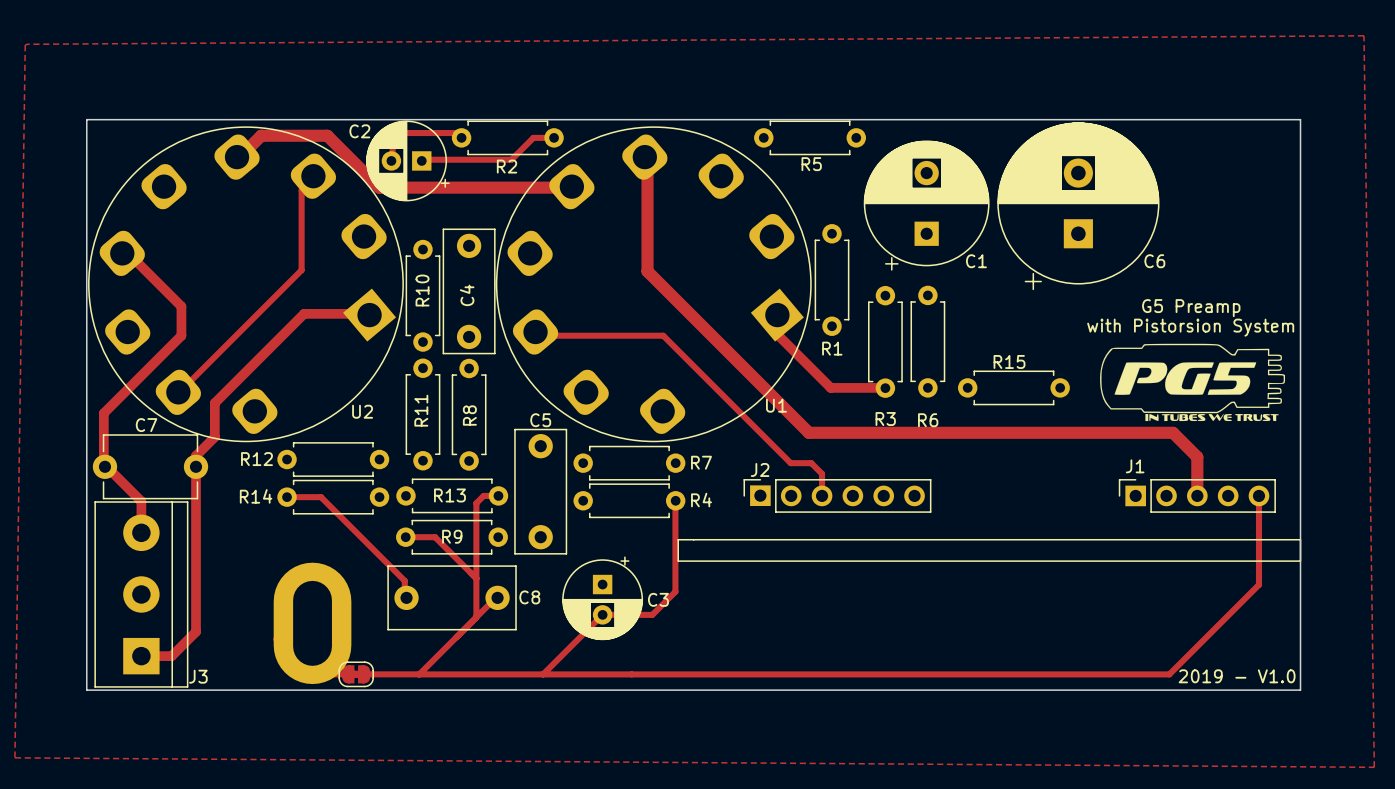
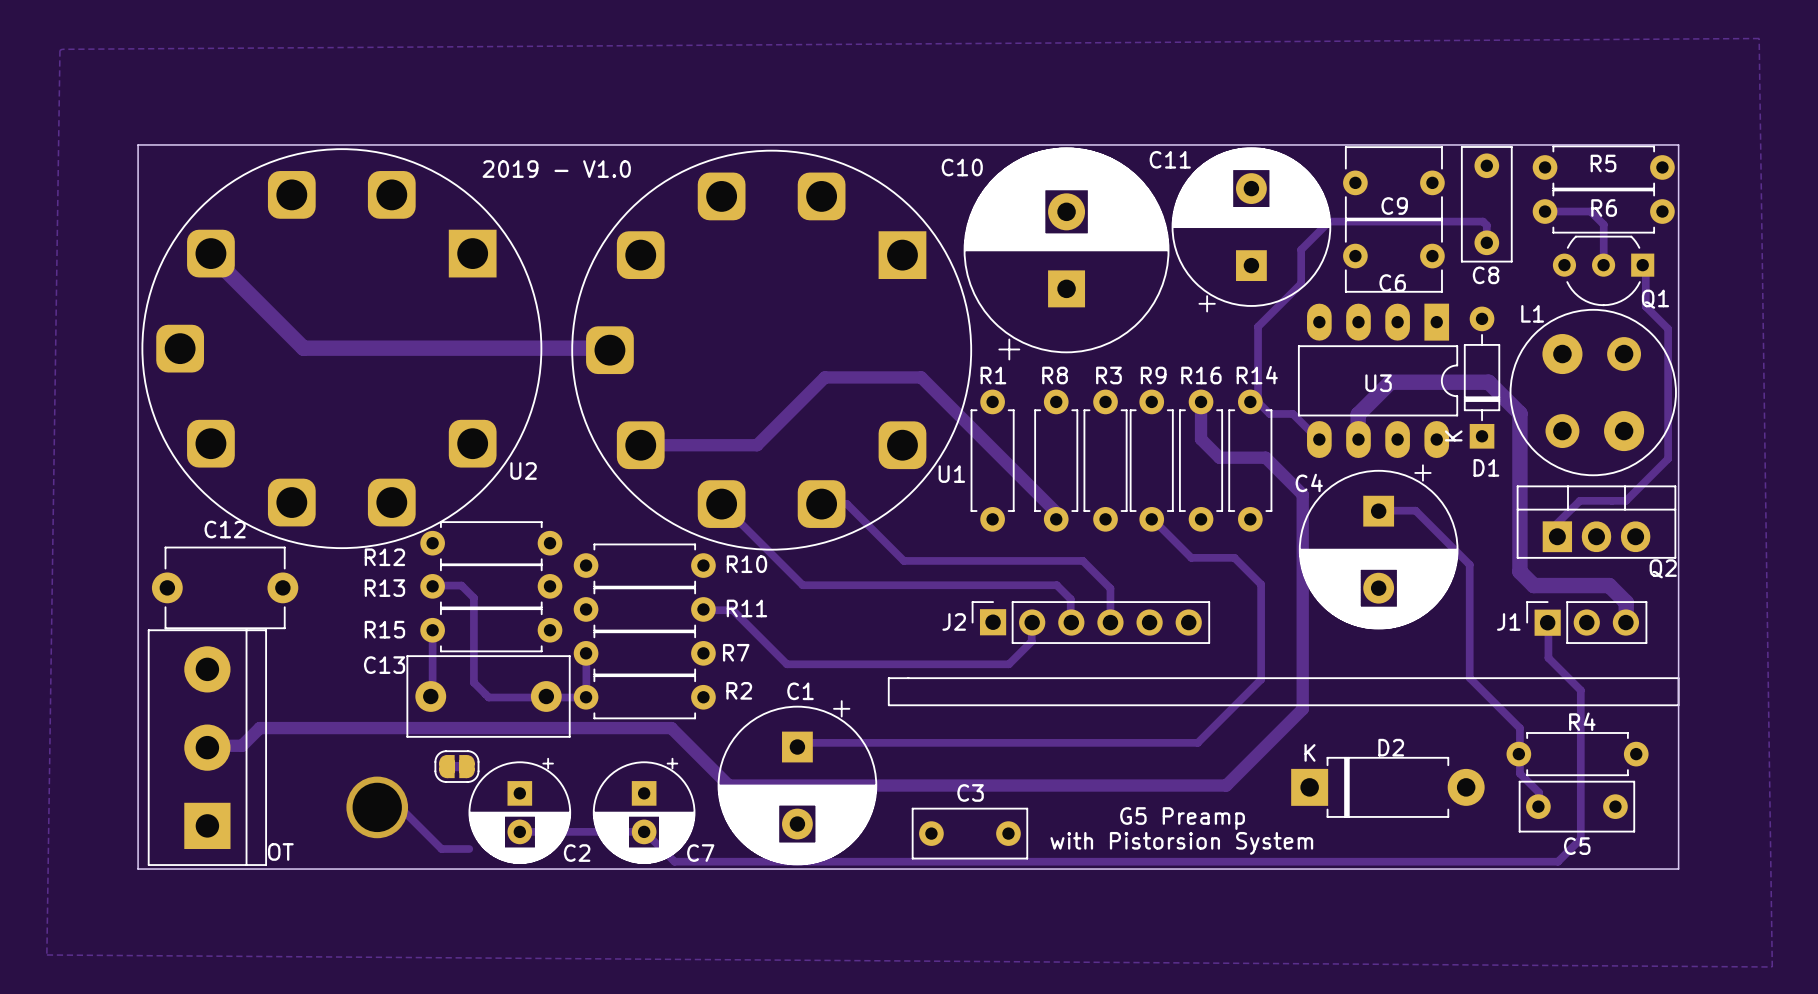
C6 footprint: [997, 122, 1160, 291] -> [1343, 219, 1445, 293]
C2 name position: C2 (359, 131) -> C2 (577, 853)
track: (456, 133) (402, 133) (392, 142) (392, 159) -> none
R2 position: (507, 137) -> (644, 697)
track: (554, 137) (533, 137) (511, 159) (422, 160) -> none
R5 position: (810, 137) -> (1603, 167)
text: none -> 2019 - V1.0 (556, 169)
C9: none -> (1393, 182)
track: (646, 154) (647, 153) (647, 271) (808, 432) (1173, 432) (1197, 457) (1197, 495) -> none
track: (239, 157) (261, 135) (327, 135) (379, 187) (568, 187) (571, 184) -> none
C2 rotation: 0° (407, 160) -> 90° counterclockwise (519, 810)
C2 position: (407, 160) -> (519, 810)
R5 name position: R5 (811, 164) -> R5 (1603, 163)
R2 name position: R2 (507, 166) -> R2 (739, 690)
track: none -> (1545, 211) (1590, 211) (1603, 224) (1603, 265)
track: (315, 176) (301, 190) (301, 270) (181, 390) -> none
C11: none -> (1251, 229)
track: none -> (1486, 242) (1486, 225) (1483, 221) (1329, 221) (1301, 249) (1301, 283) (1258, 326) (1258, 402) (1269, 413) (1292, 413) (1319, 440)
track: none -> (210, 253) (303, 348) (613, 348)
C10: none -> (1066, 253)
C1 rotation: 0° (926, 205) -> 180° (797, 782)
C1 position: (926, 205) -> (797, 782)
track: none -> (1643, 264) (1645, 267) (1645, 306) (1668, 328) (1668, 458) (1626, 500) (1579, 500) (1556, 524) (1556, 537)
Q1: none -> (1603, 270)
C4 footprint: [442, 228, 496, 355] -> [1298, 464, 1459, 630]
track: (128, 253) (181, 306) (181, 335) (103, 413) (103, 464) (141, 501) (141, 531) -> none
C1 name position: C1 (976, 261) -> C1 (800, 691)
C6 name position: C6 (1154, 261) -> C6 (1392, 283)
R1 position: (832, 280) -> (992, 460)
U2 rotation: 0° (245, 284) -> 50° counterclockwise (341, 348)
U1 rotation: 0° (653, 284) -> 50° counterclockwise (771, 350)
R10 name position: R10 (422, 290) -> R10 (746, 564)
R10 rotation: 0° (422, 295) -> 90° clockwise (644, 565)
R10 position: (422, 295) -> (644, 565)
C4 name position: C4 (467, 295) -> C4 (1309, 482)
D1: none -> (1482, 377)
U3: none -> (1378, 380)
text: G5 Preamp (1191, 308) -> none
track: (777, 312) (777, 334) (830, 387) (885, 387) -> none
L1: none -> (1593, 392)
track: (372, 315) (304, 313) (214, 403) (214, 437) (196, 455) (196, 631) (171, 656) (141, 656) -> none
track: none -> (1201, 402) (1201, 439) (1219, 457) (1265, 457) (1302, 494) (1302, 709) (1226, 785) (728, 785) (671, 728) (259, 728) (242, 745) (200, 745) (197, 748)
text: with Pistorsion System (1190, 327) -> none
track: (535, 332) (539, 335) (663, 335) (790, 463) (811, 463) (822, 473) (822, 495) -> none
R3 position: (885, 341) -> (1105, 460)
R6 rotation: 0° (927, 341) -> 90° clockwise (1603, 211)
R6 position: (927, 341) -> (1603, 211)
drawing: [1100, 343, 1286, 422] -> none
R1 name position: R1 (832, 348) -> R1 (993, 375)
track: none -> (1358, 440) (1358, 414) (1390, 382) (1488, 382) (1519, 413) (1519, 571) (1533, 585) (1609, 585) (1626, 602) (1626, 625)
track: none -> (640, 445) (757, 445) (824, 377) (921, 377) (1056, 512) (1056, 518)
R15 name position: R15 (1009, 361) -> R15 (384, 629)
R16: none -> (1201, 460)
R15 position: (1013, 387) -> (491, 630)
track: none -> (721, 504) (802, 585) (1056, 585) (1070, 599) (1070, 620) (1072, 622)
track: none -> (821, 504) (847, 504) (903, 560) (1082, 560) (1110, 588) (1110, 619) (1112, 622)
U1 name position: U1 (776, 405) -> U1 (951, 474)
track: none -> (1379, 510) (1415, 510) (1469, 564) (1469, 678) (1519, 728) (1519, 773) (1539, 792) (1539, 812)
R11 name position: R11 (421, 410) -> R11 (746, 608)
U2 name position: U2 (362, 411) -> U2 (523, 470)
R11 rotation: 0° (422, 414) -> 90° clockwise (644, 609)
R11 position: (422, 414) -> (644, 609)
R8 position: (469, 414) -> (1056, 460)
track: none -> (1152, 518) (1191, 557) (1234, 557) (1261, 584) (1261, 679) (1197, 742) (797, 743)
R8 name rotation: 0° (469, 415) -> 90° clockwise (1055, 375)
R8 name position: R8 (469, 415) -> R8 (1055, 375)
Q2: none -> (1596, 522)
R3 name position: R3 (885, 419) -> R3 (1108, 375)
C5 name position: C5 (540, 420) -> C5 (1577, 846)
R6 name position: R6 (928, 420) -> R6 (1604, 208)
C7 name position: C7 (146, 425) -> C7 (700, 853)
C5 footprint: [514, 428, 568, 555] -> [1518, 780, 1636, 833]
C7 footprint: [92, 434, 209, 500] -> [592, 757, 696, 864]
R12 name position: R12 (256, 459) -> R12 (384, 557)
R12 position: (333, 459) -> (491, 543)
R7 position: (629, 463) -> (644, 653)
J1 name position: J1 (1135, 466) -> J1 (1508, 621)
C12: none -> (225, 587)
track: none -> (433, 588) (436, 585) (461, 585) (473, 597) (473, 682) (488, 697) (586, 697) (586, 654)
J2 name position: J2 (760, 469) -> J2 (954, 621)
J1 footprint: [1118, 479, 1276, 513] -> [1526, 601, 1648, 644]
track: none -> (703, 615) (708, 610) (732, 610) (786, 664) (1008, 664) (1031, 641) (1031, 625) (1034, 623)
R13 name position: R13 (449, 495) -> R13 (384, 588)
R13 position: (452, 495) -> (491, 586)
track: (498, 495) (483, 495) (476, 503) (476, 617) -> none
track: none -> (1548, 621) (1548, 657) (1580, 690) (1580, 838) (1558, 861) (674, 861) (644, 831) (519, 831)
track: (1258, 495) (1258, 584) (1169, 674) (419, 674) -> none
track: (287, 497) (321, 497) (404, 580) (404, 599) -> none
R14 rotation: 0° (333, 497) -> 90° clockwise (1250, 460)
R14 position: (333, 497) -> (1250, 460)
R4 position: (629, 500) -> (1577, 754)
track: (675, 500) (675, 591) (652, 614) (602, 614) (543, 674) -> none
R4 name position: R4 (701, 500) -> R4 (1582, 721)
track: none -> (432, 630) (432, 694)
R9 name position: R9 (452, 536) -> R9 (1153, 375)
track: (405, 537) (435, 537) (476, 578) -> none
R9 rotation: 0° (451, 537) -> 90° clockwise (1151, 460)
R9 position: (451, 537) -> (1151, 460)
C13: none -> (488, 696)
C3 footprint: [562, 556, 644, 641] -> [911, 807, 1029, 860]
C8 footprint: [387, 565, 517, 631] -> [1460, 146, 1513, 263]
track: (497, 597) (419, 674) (363, 674) -> none
C8 name position: C8 (529, 597) -> C8 (1486, 275)
C3 name position: C3 (658, 599) -> C3 (970, 792)
part: (312, 623) -> none
D2: none -> (1387, 787)
via: none -> (377, 807)
text: none -> G5 Preamp (1182, 818)
text: none -> with Pistorsion System (1181, 843)
part position: (356, 674) -> (456, 766)
J3 name: J3 (198, 676) -> OT (280, 851)
text: 2019 - V1.0 (1237, 676) -> none

